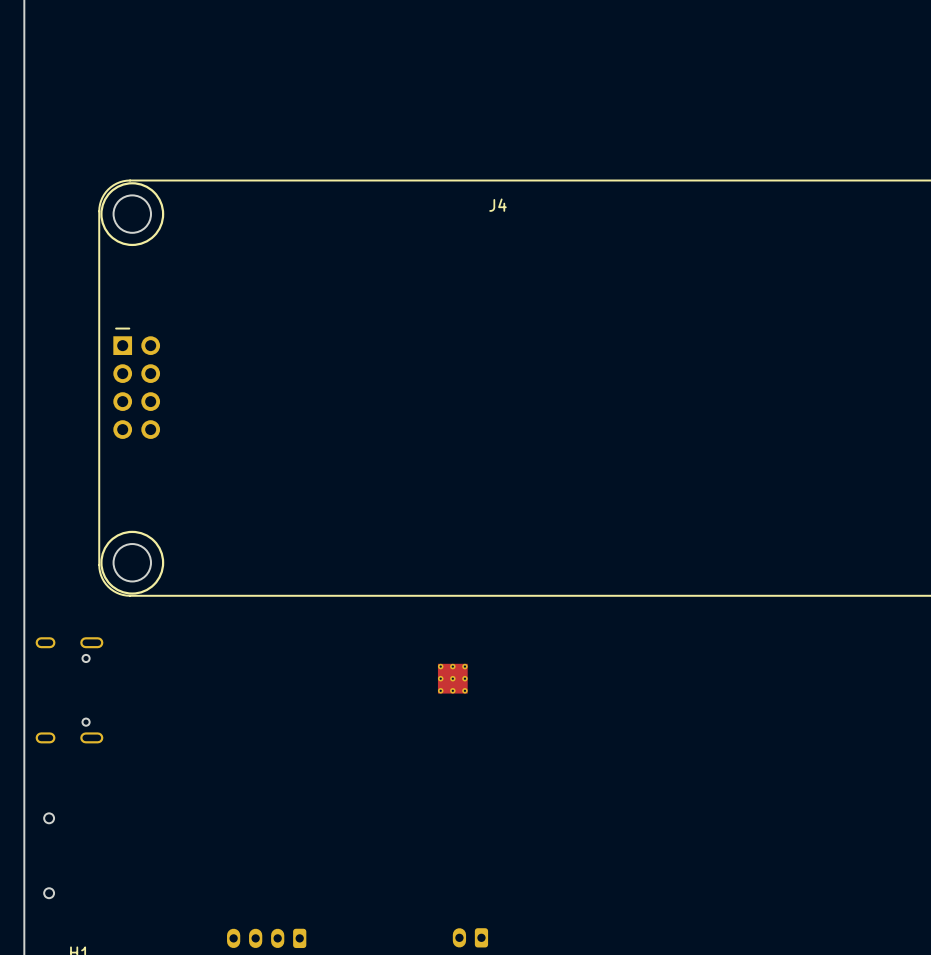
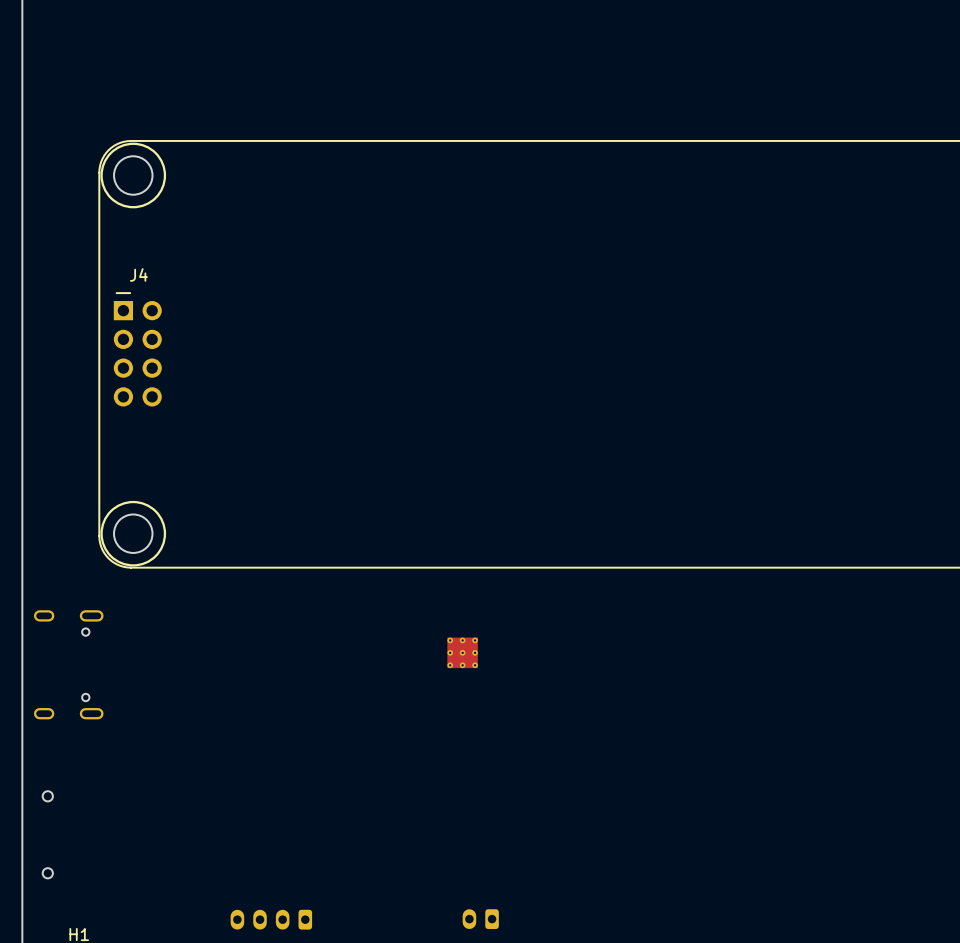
J4 name position: J4 (498, 205) -> J4 (138, 274)

